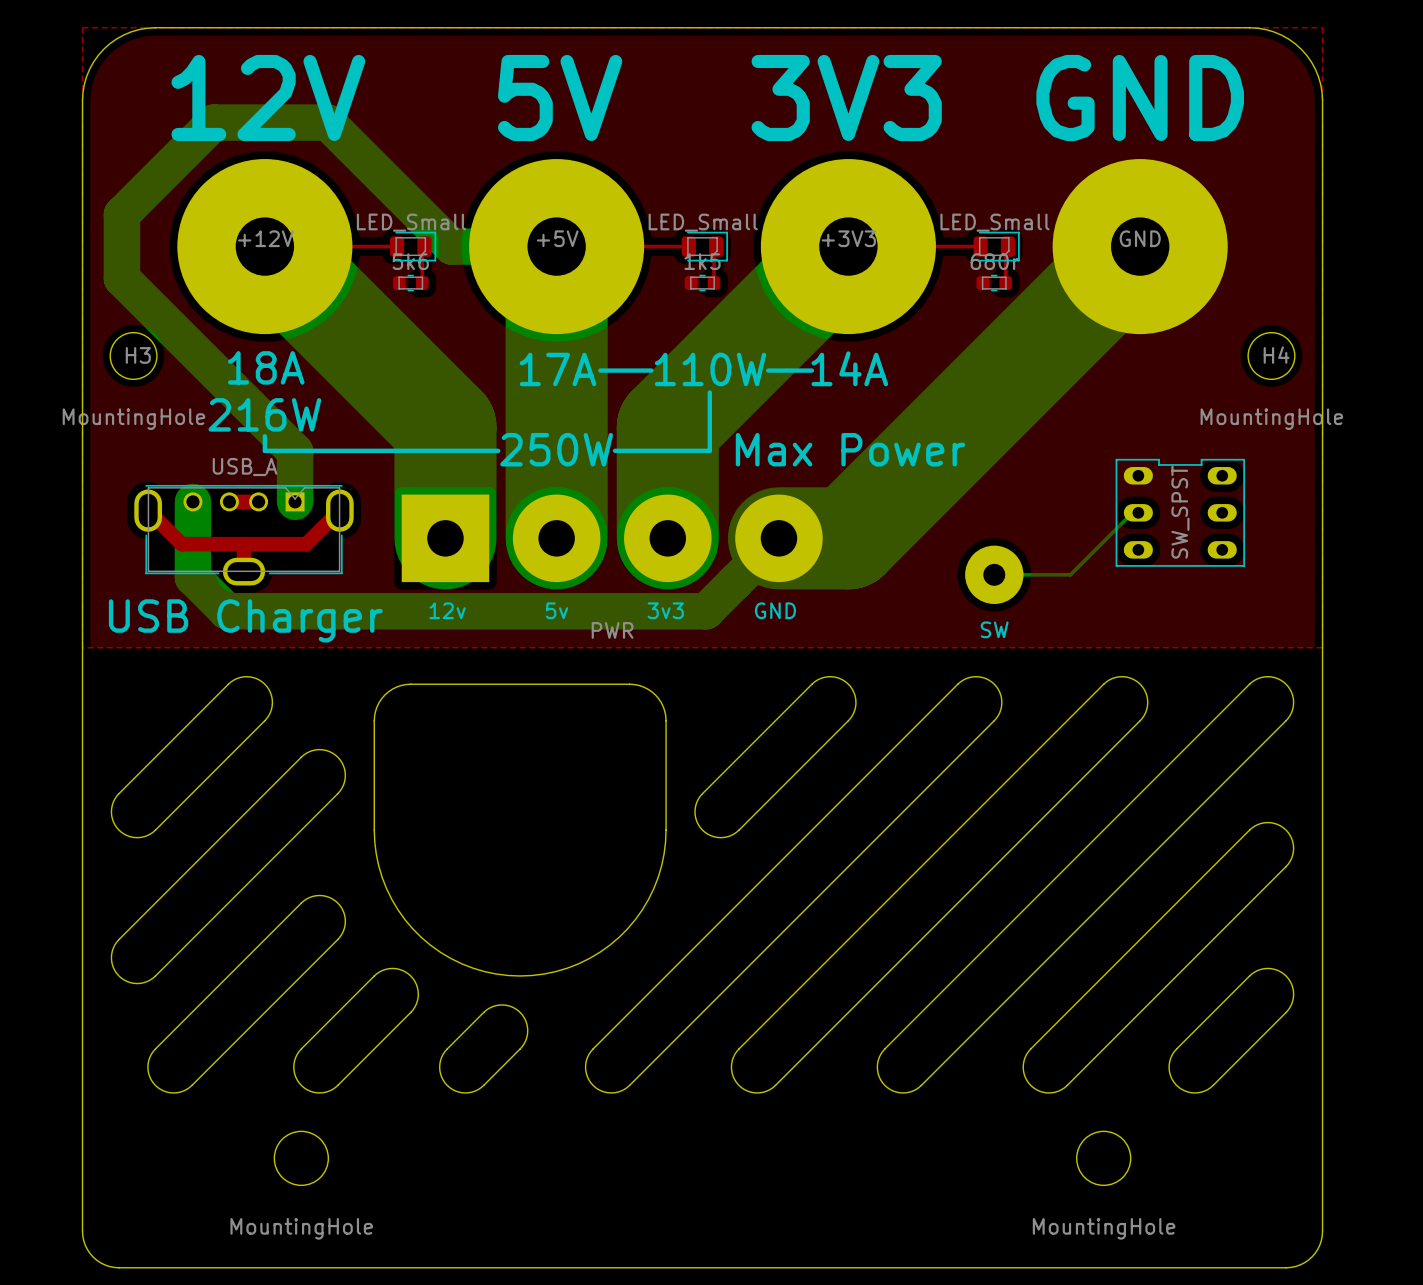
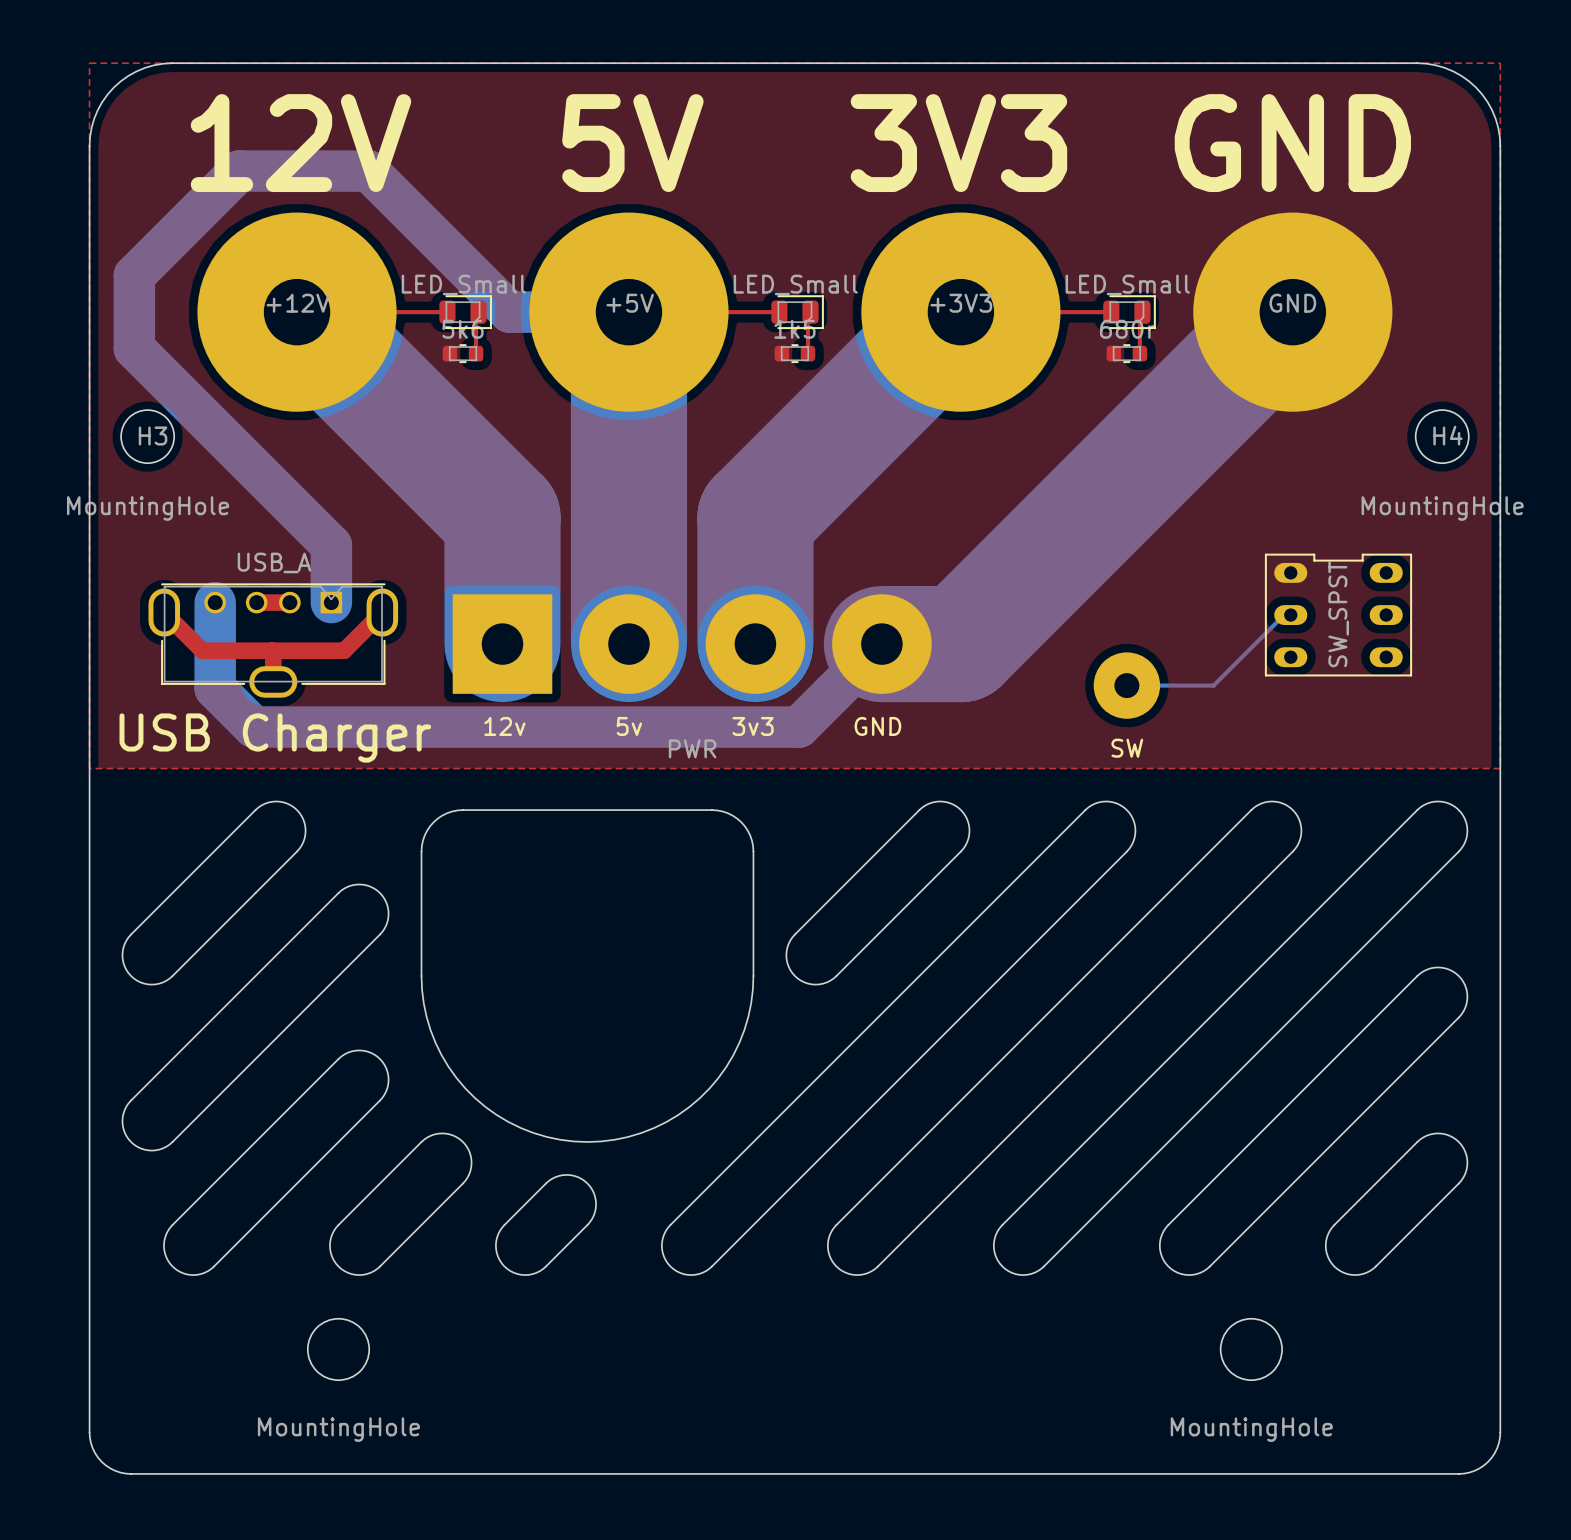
text: 18A (266, 367) -> none
text: 14A (849, 368) -> none
text: 17A (558, 369) -> none
text: 110W (710, 369) -> none
line: (600, 370) (651, 370) -> none
line: (768, 370) (811, 370) -> none
line: (709, 392) (709, 450) (614, 450) -> none
text: 216W (264, 414) -> none
line: (264, 436) (264, 450) (498, 450) -> none
text: 250W (556, 449) -> none
text: Max Power (850, 449) -> none

